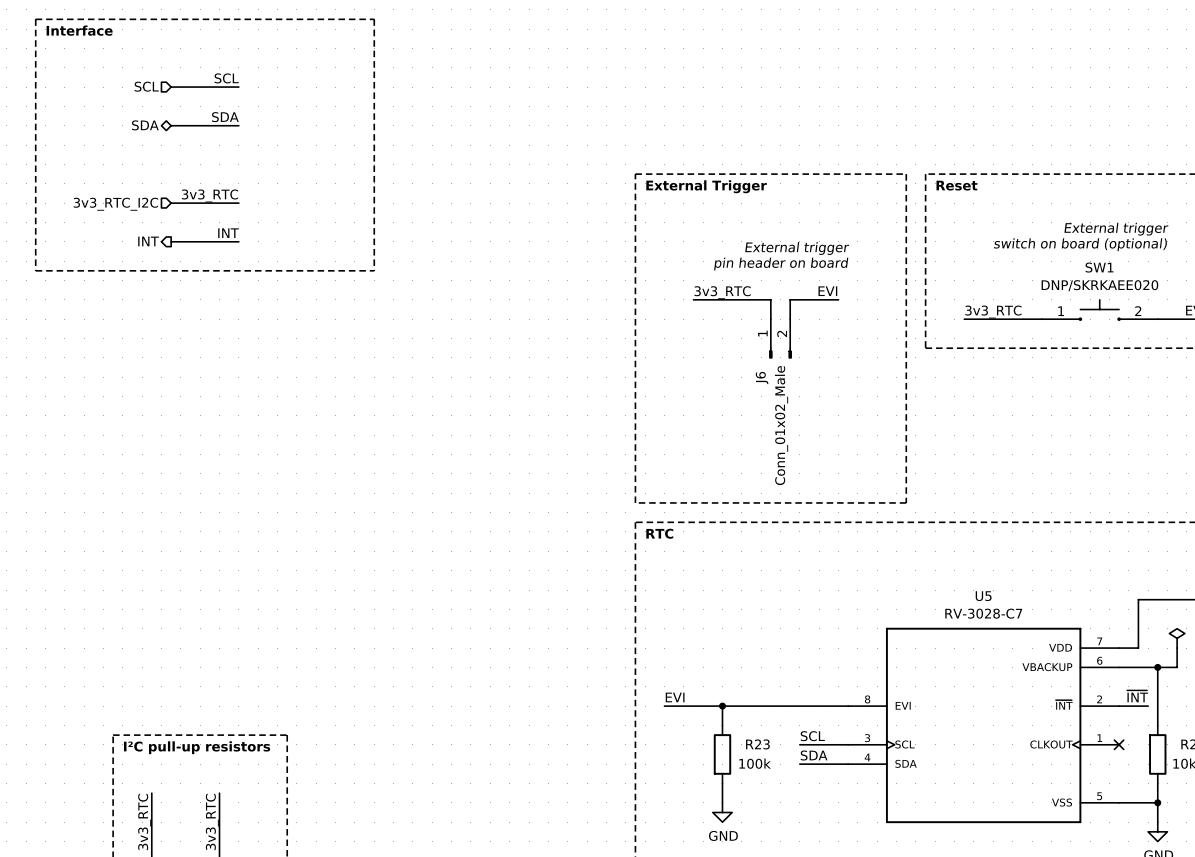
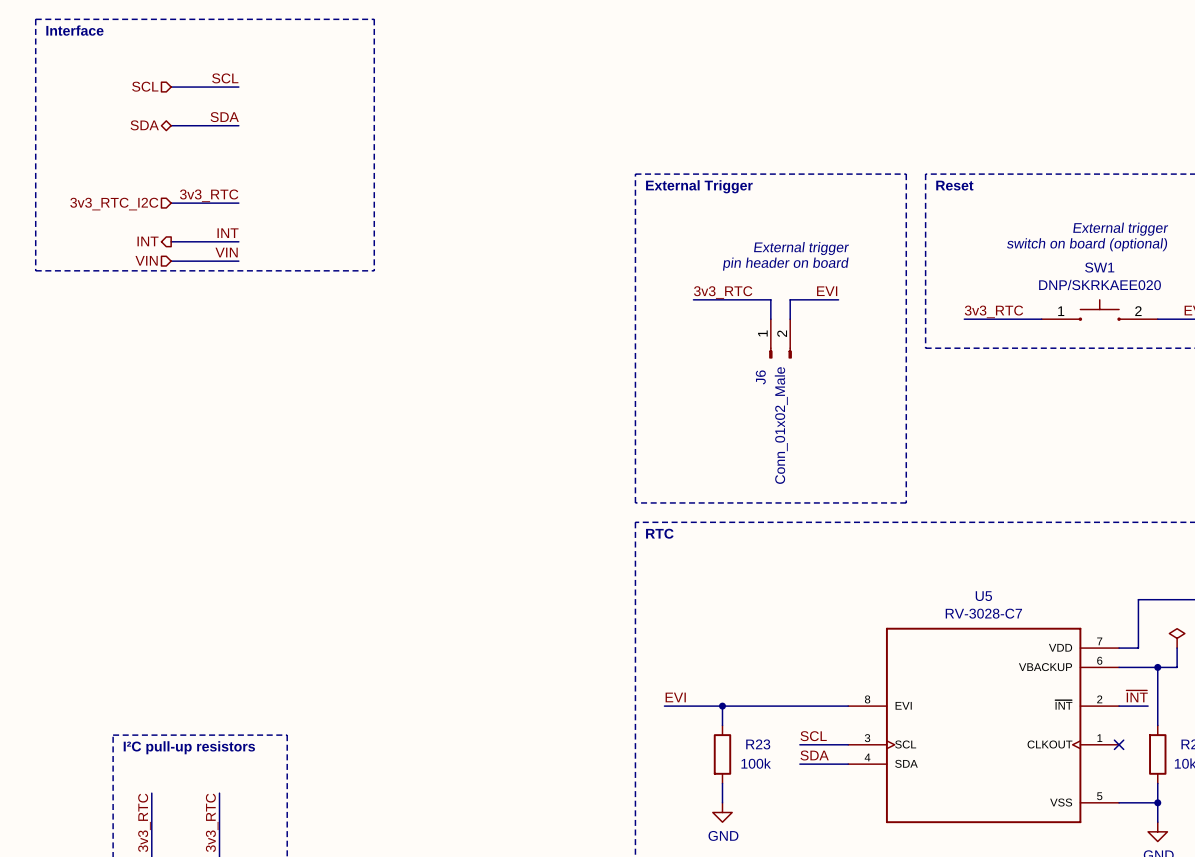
label: none -> VIN (226, 252)
hierarchical label: none -> VIN (146, 260)
wire: none -> (171, 261) (238, 261)

